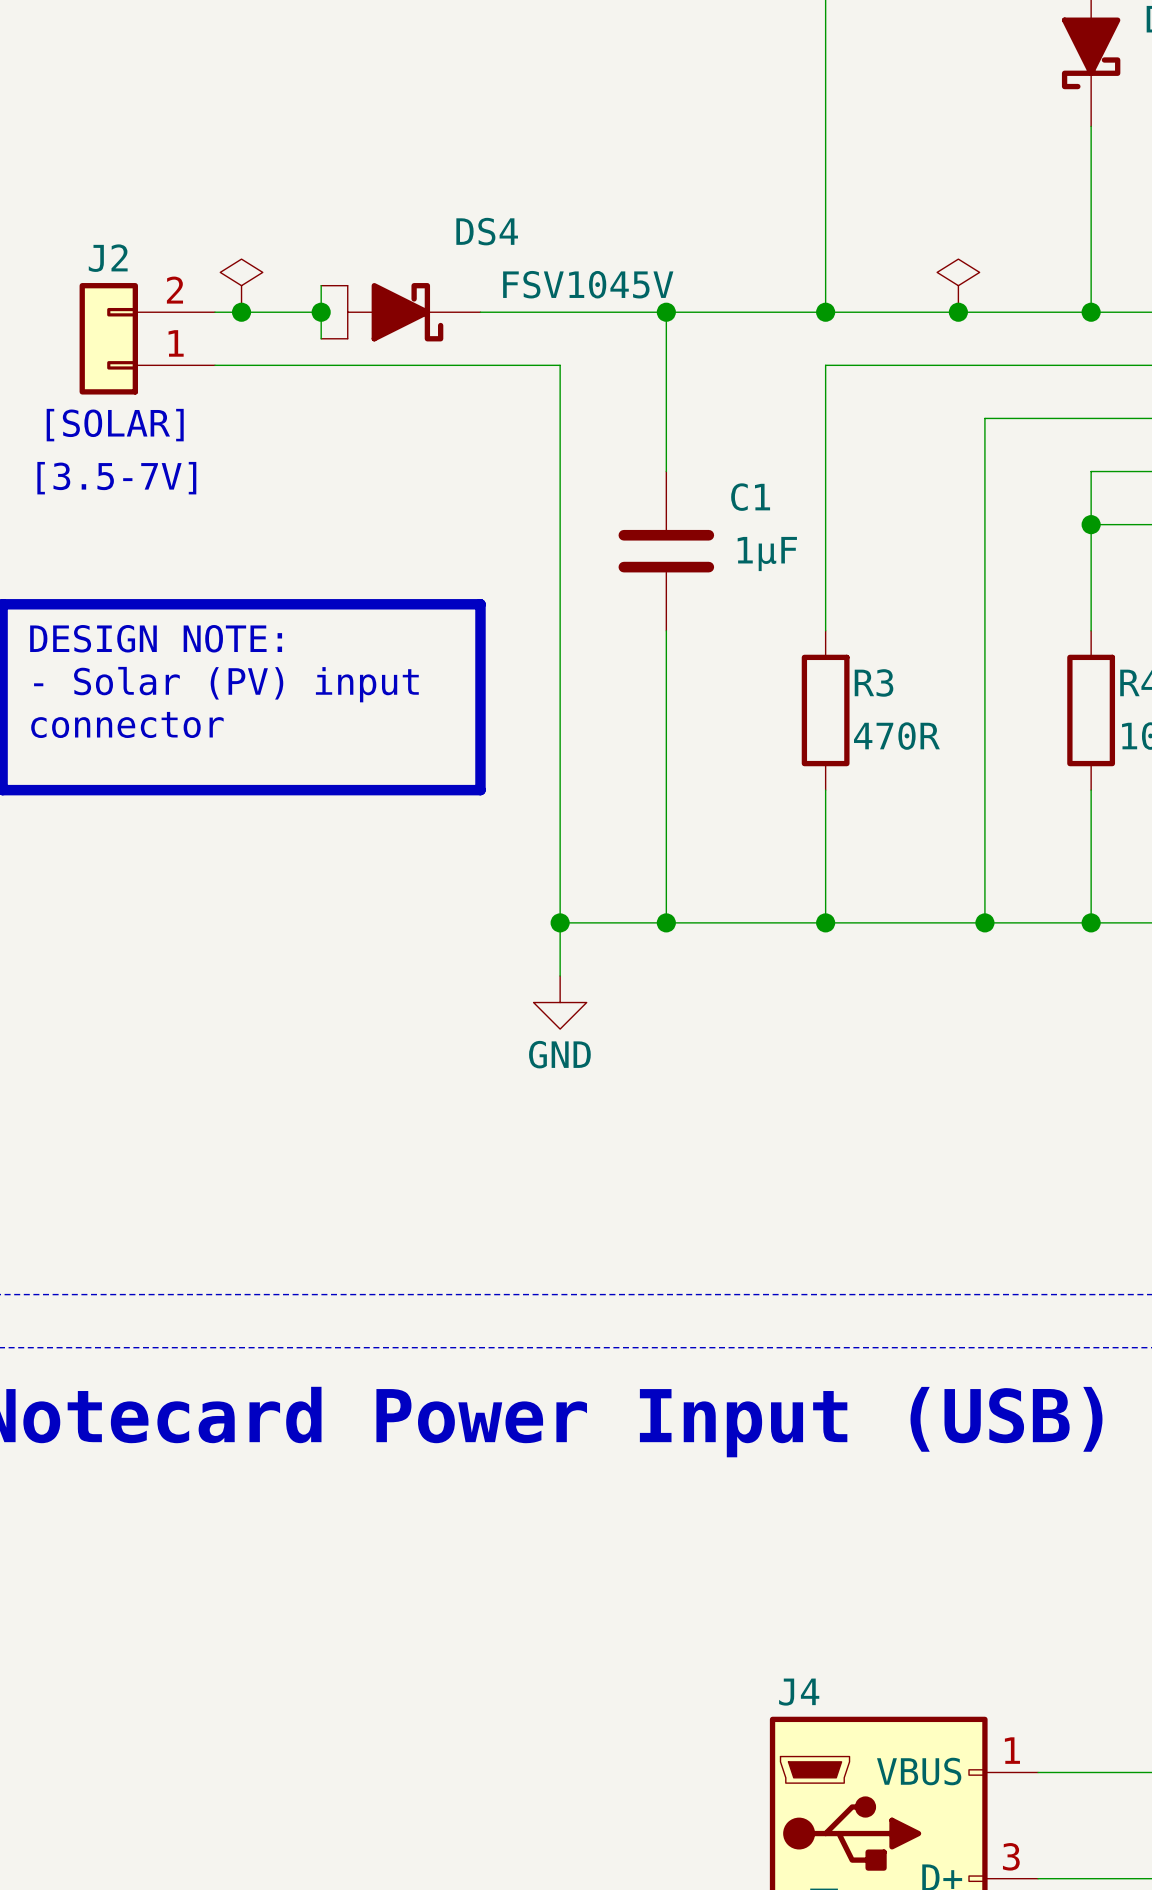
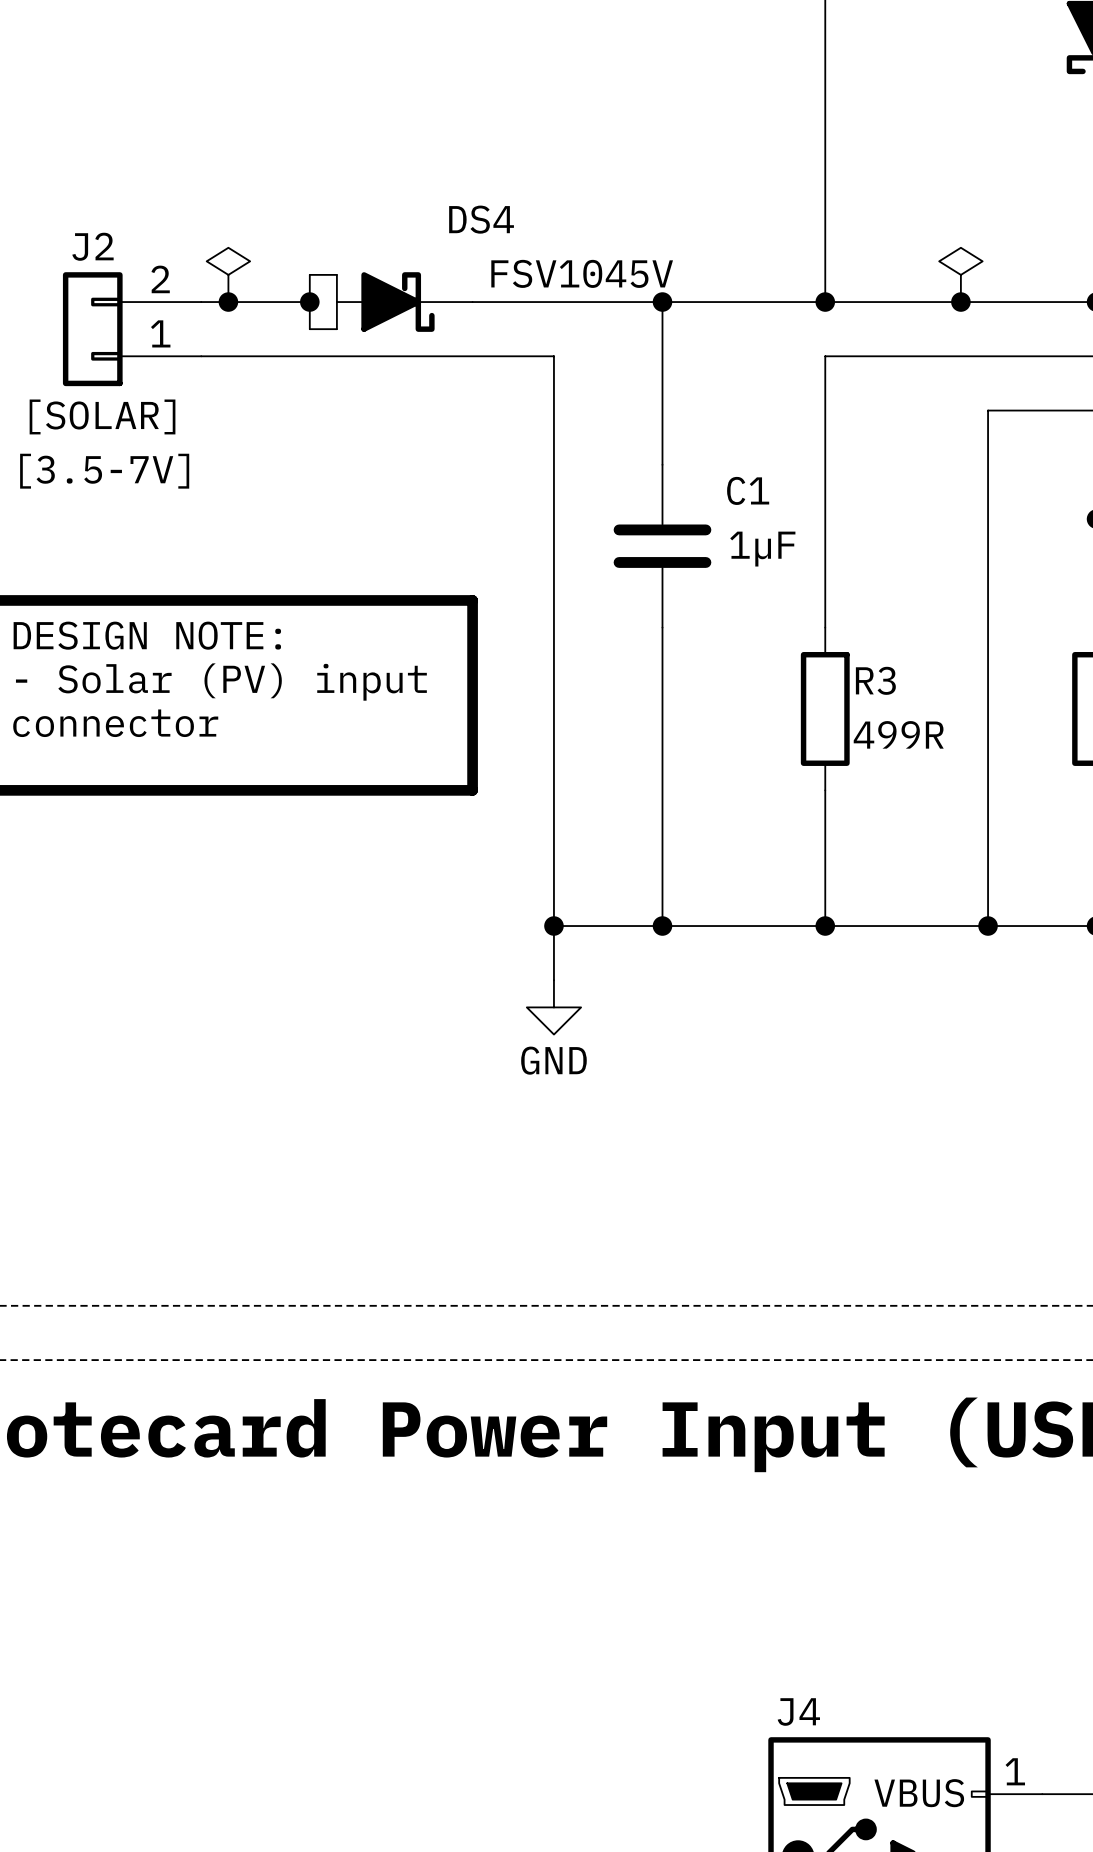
R3 value: 470R (896, 736) -> 499R (898, 734)

